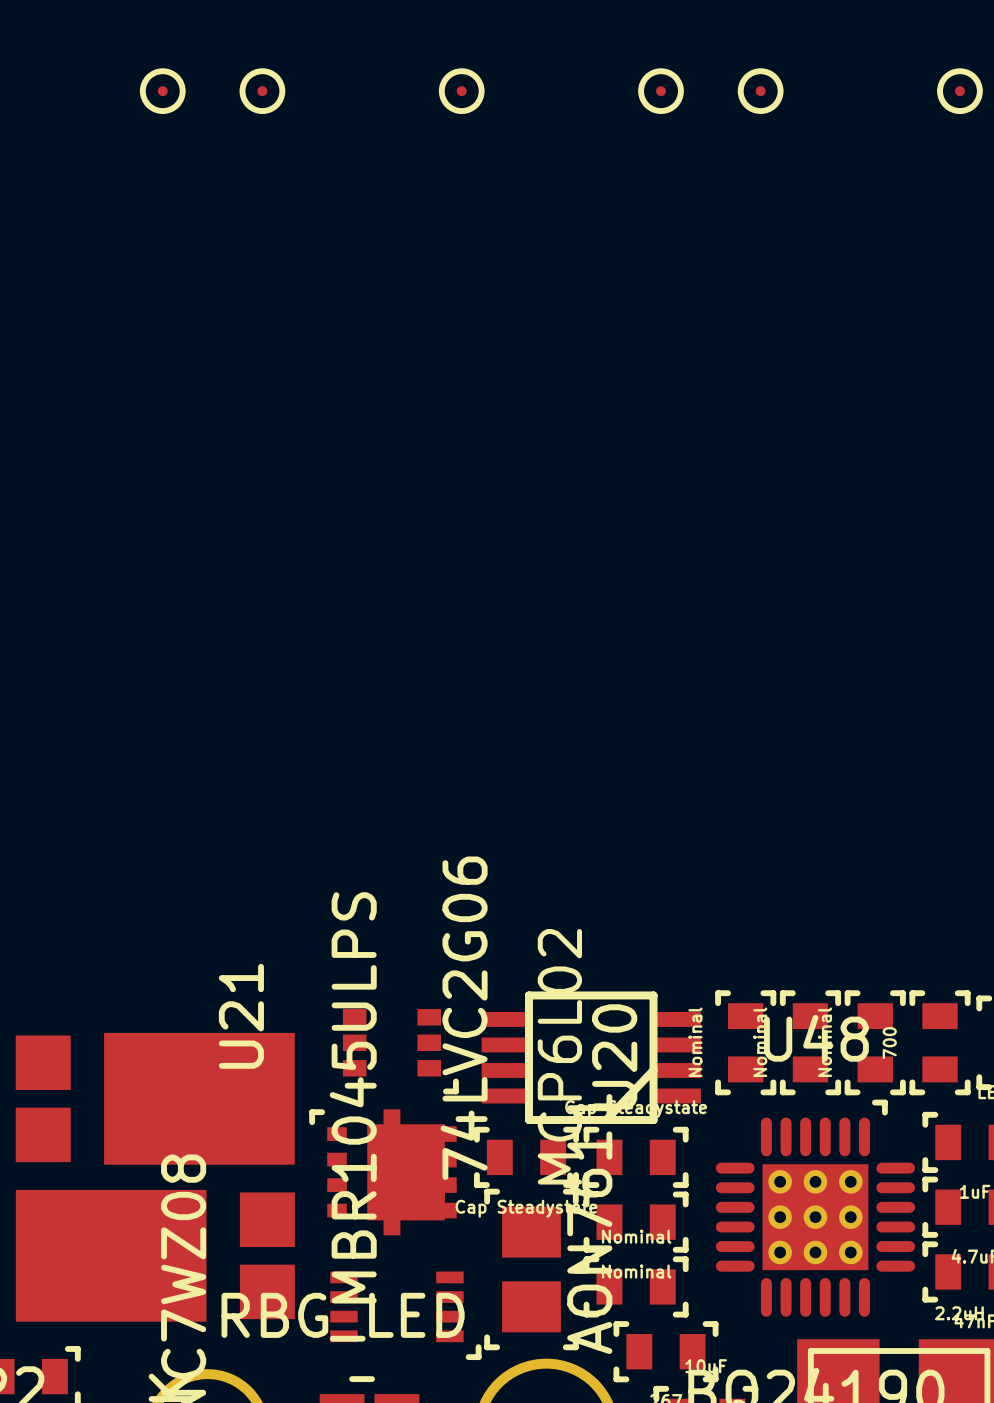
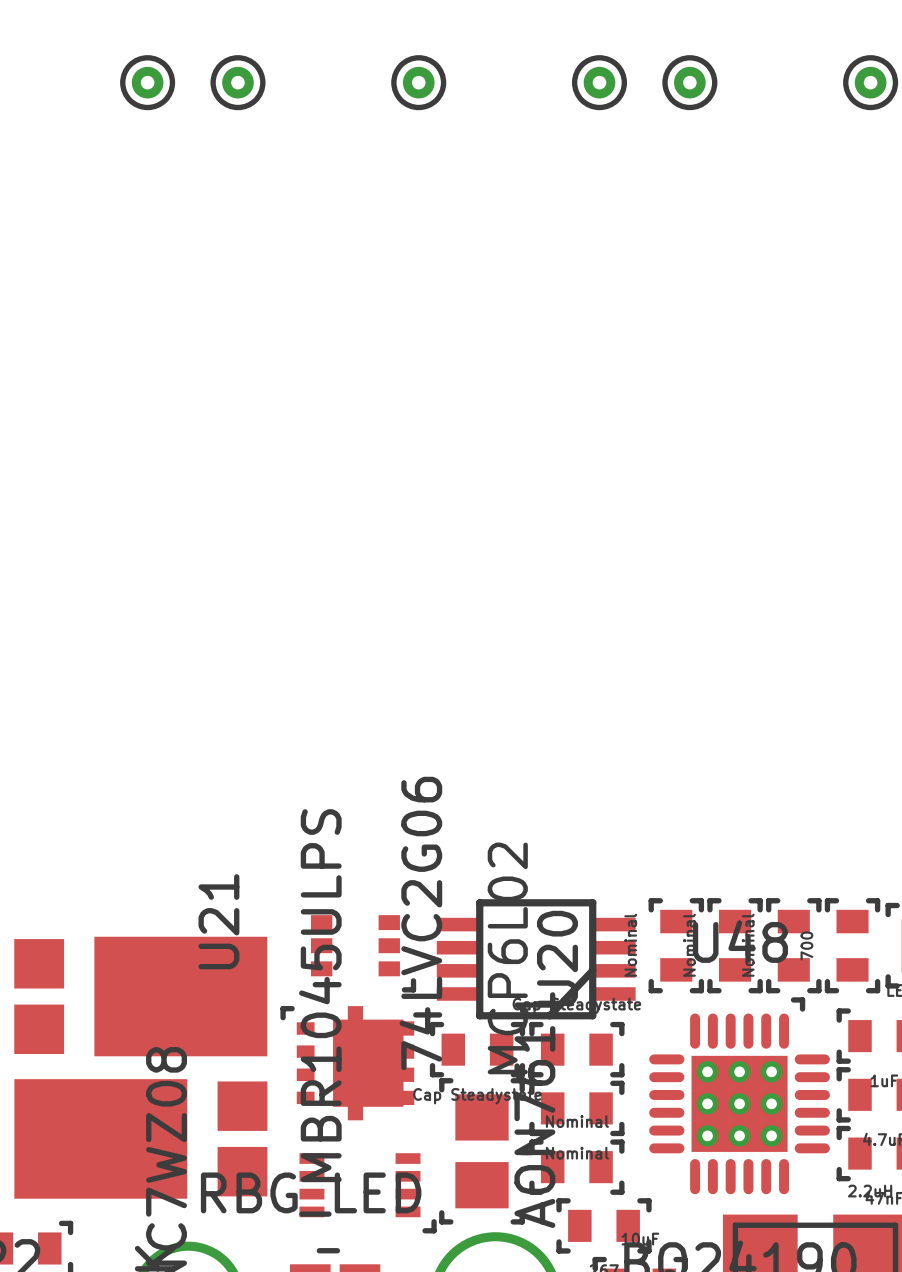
part footprint: [139, 68, 186, 115] -> [120, 55, 176, 111]
part footprint: [239, 68, 286, 115] -> [210, 55, 266, 111]
part footprint: [438, 68, 485, 115] -> [391, 55, 447, 111]
part footprint: [638, 68, 684, 115] -> [571, 55, 628, 111]
part footprint: [737, 68, 784, 115] -> [662, 55, 718, 111]
part footprint: [937, 68, 983, 115] -> [843, 55, 899, 111]

